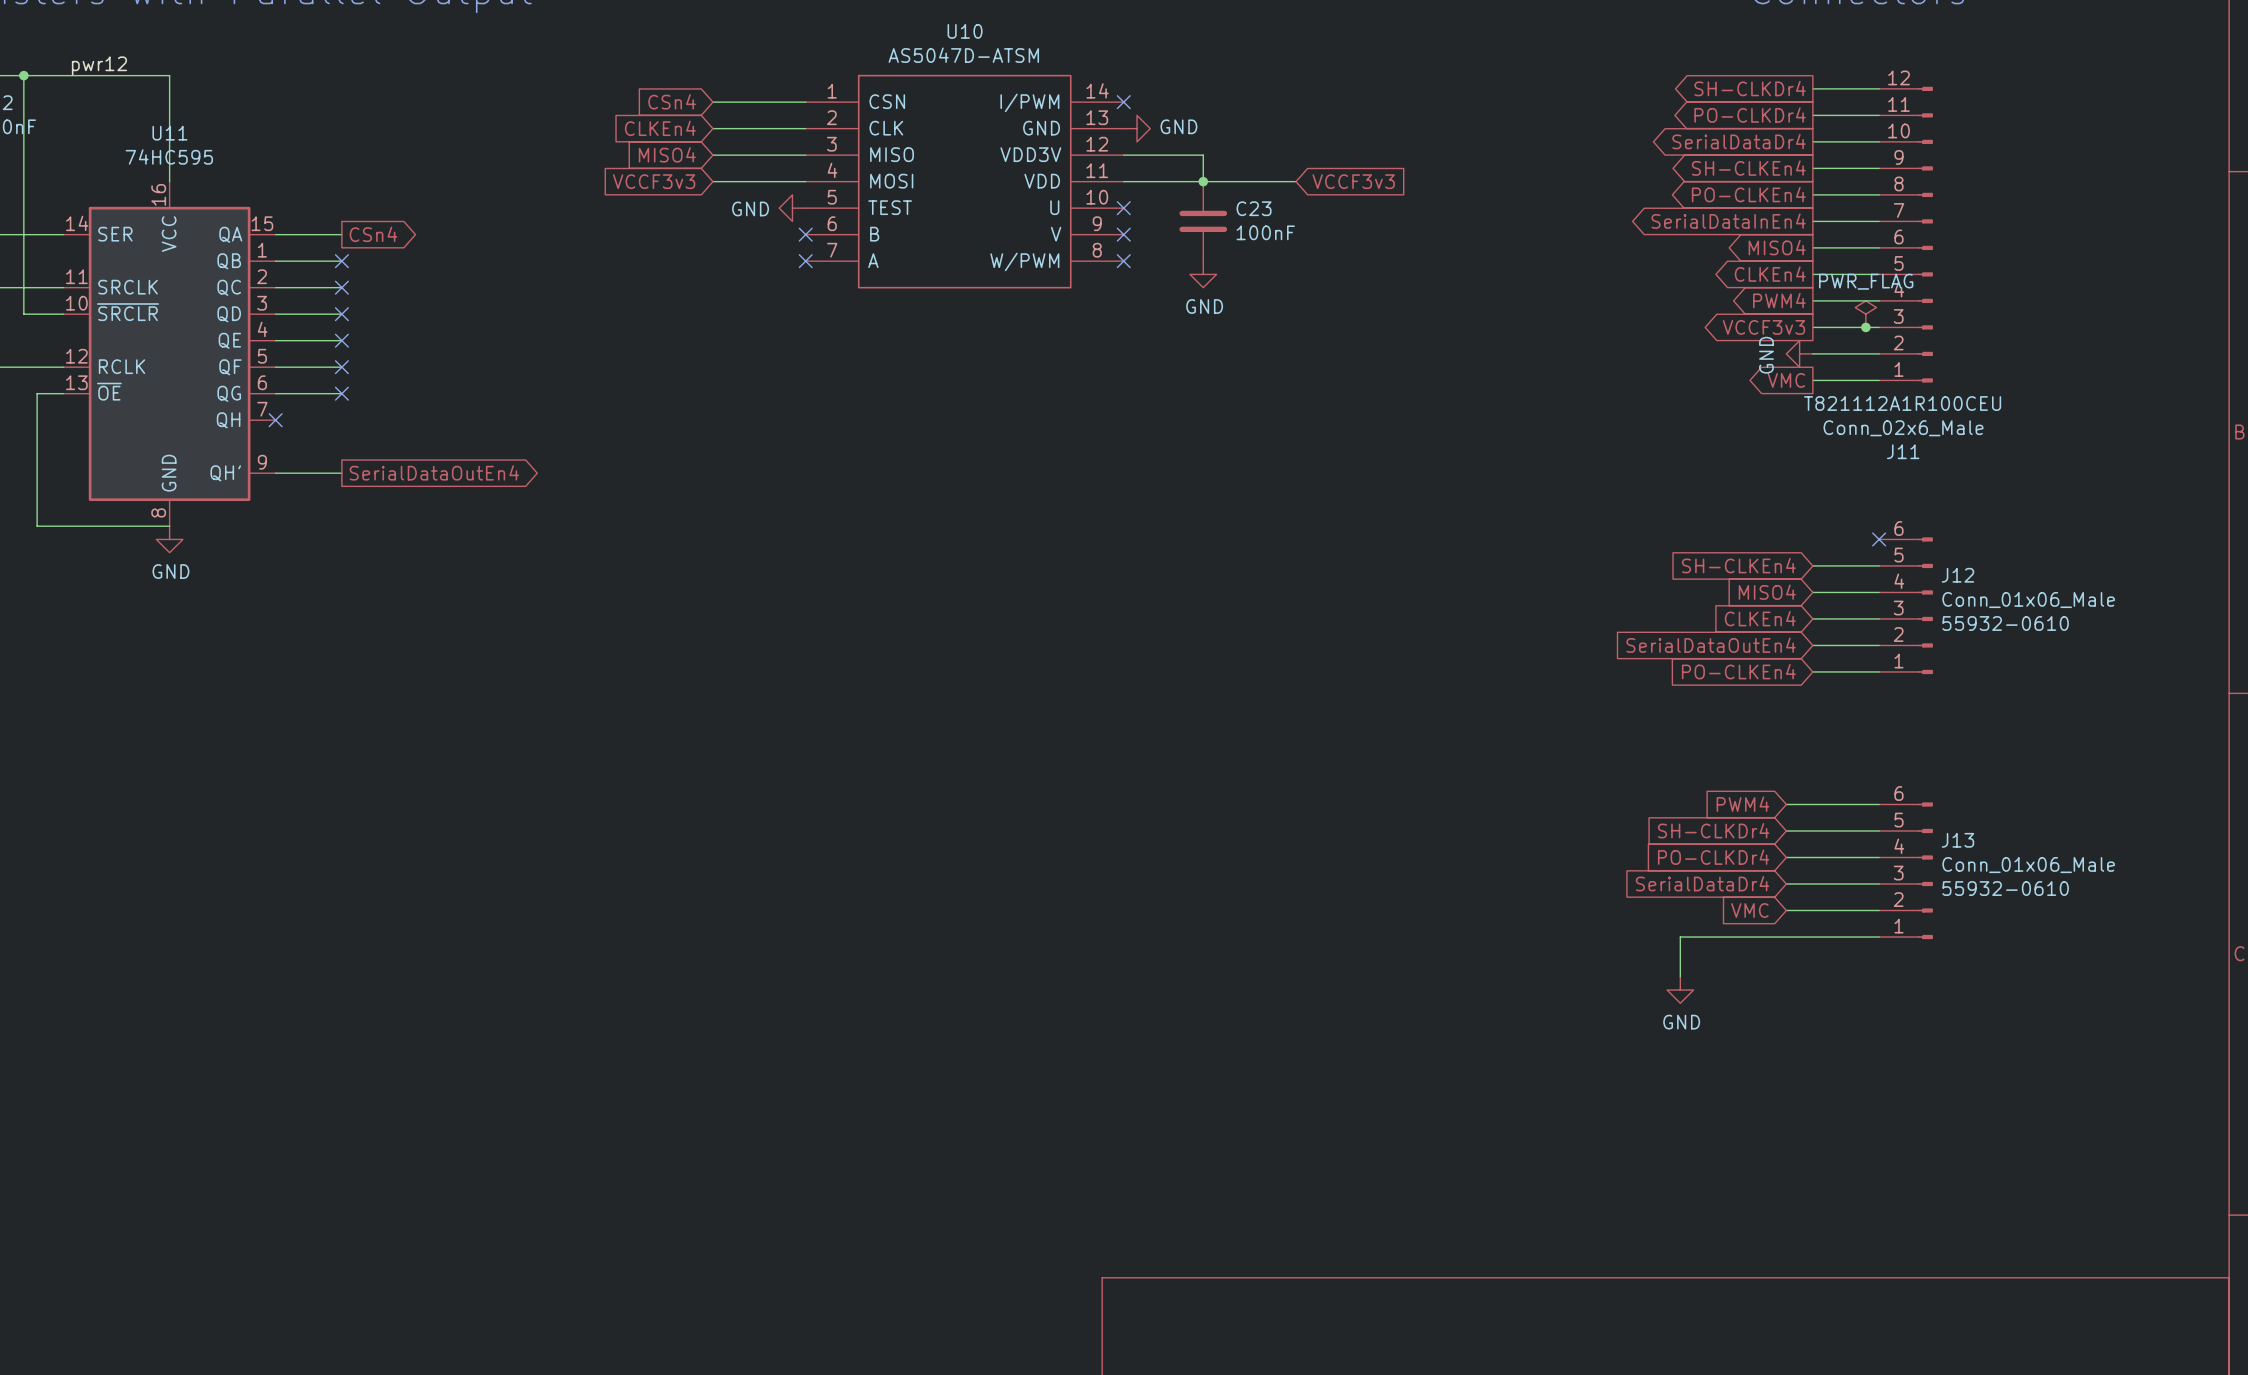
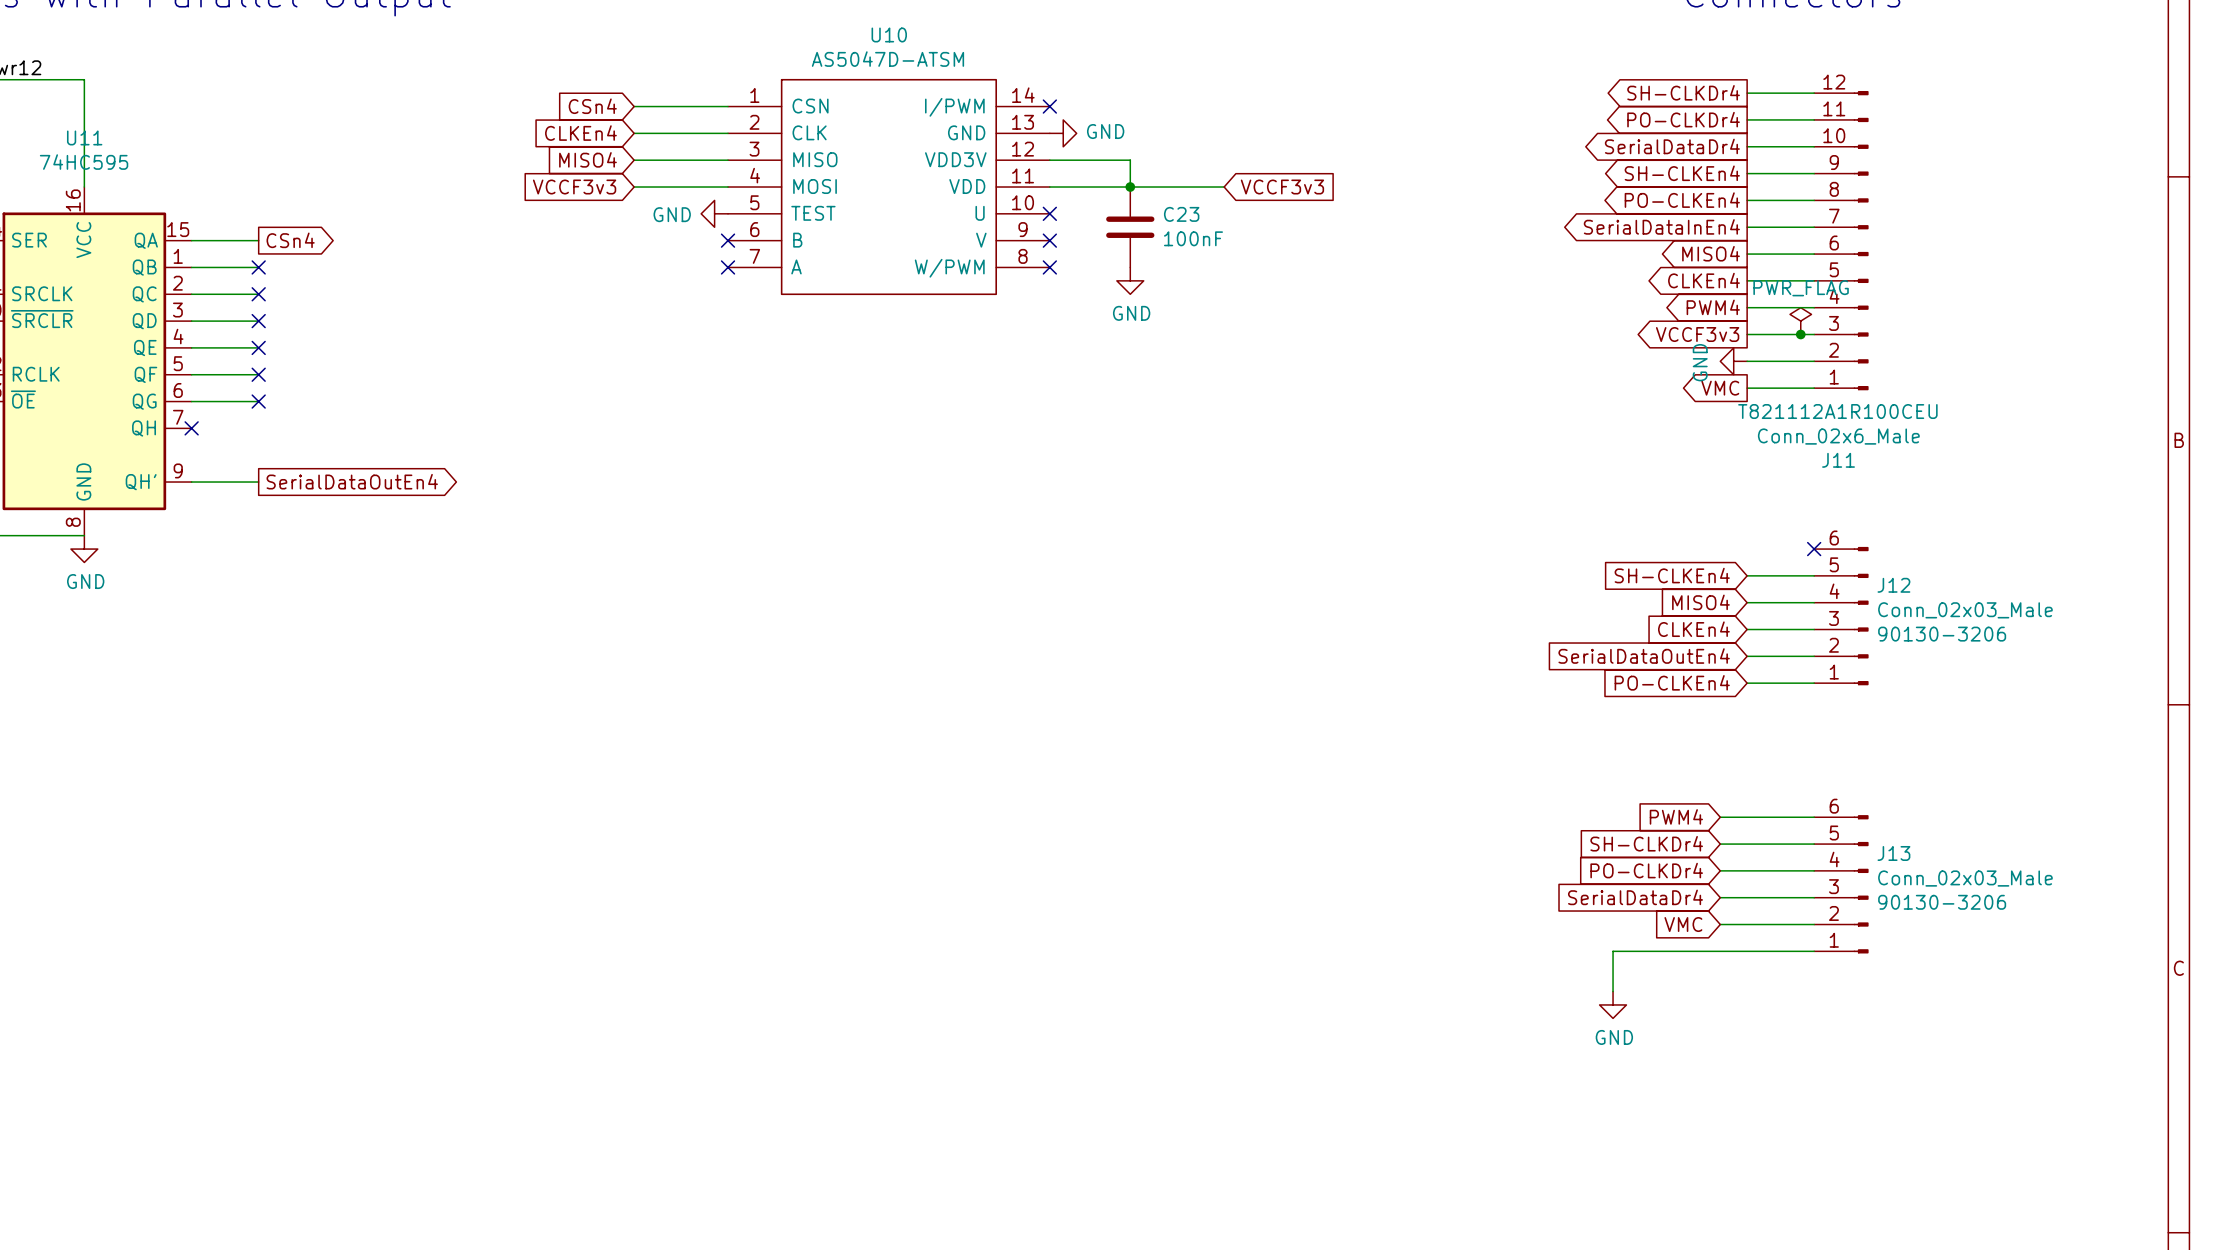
J12 value: Conn_01x06_Male (2028, 600) -> Conn_02x03_Male (1965, 610)
J12 text: 55932-0610 (2005, 623) -> 90130-3206 (1942, 634)
J13 value: Conn_01x06_Male (2028, 865) -> Conn_02x03_Male (1965, 878)
J13 text: 55932-0610 (2005, 888) -> 90130-3206 (1942, 902)

